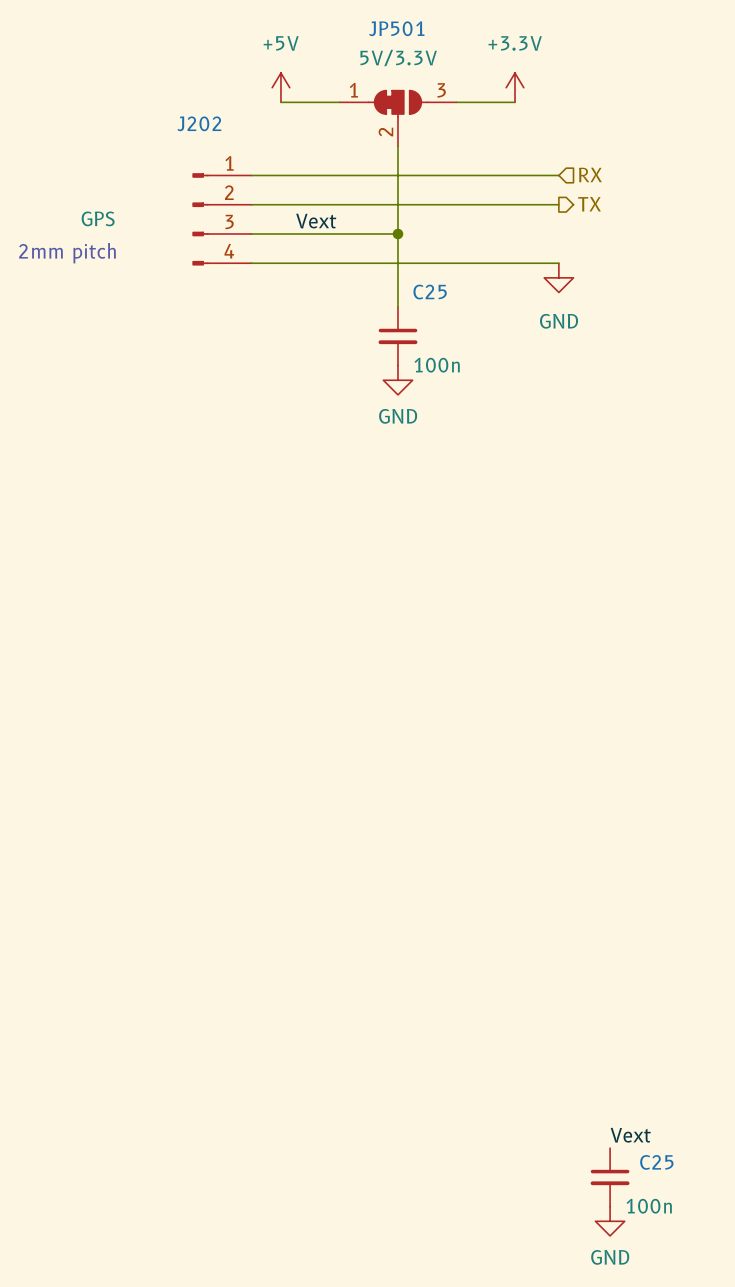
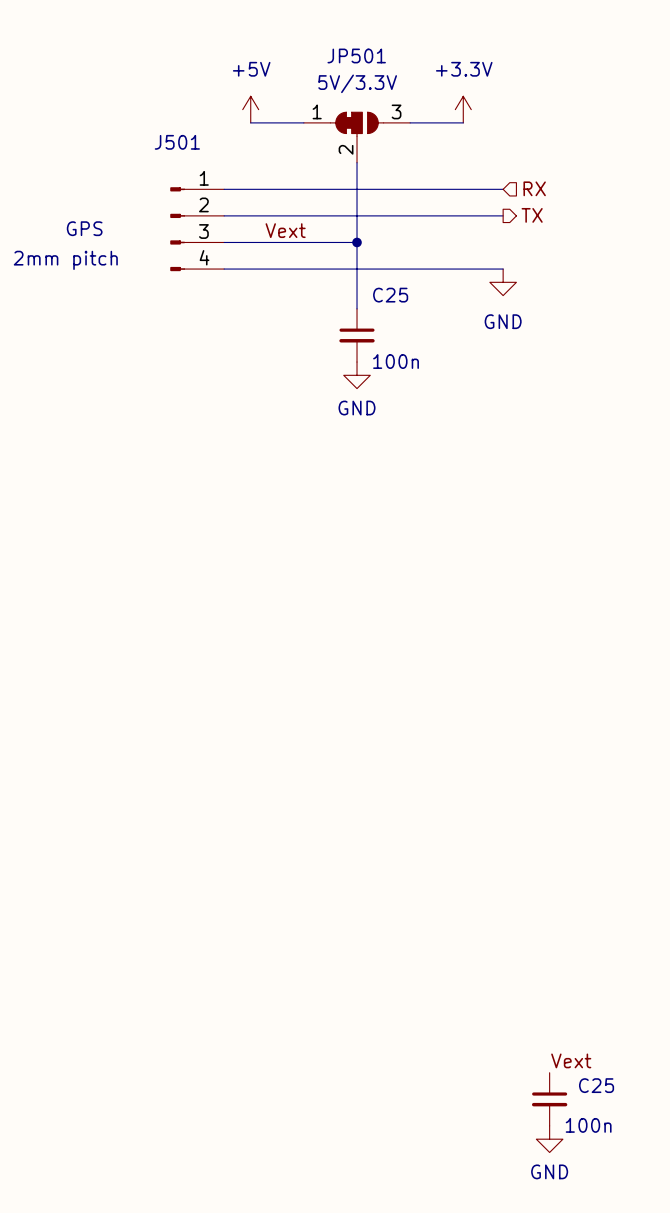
J202 name: J202 (199, 123) -> J501 (177, 142)

